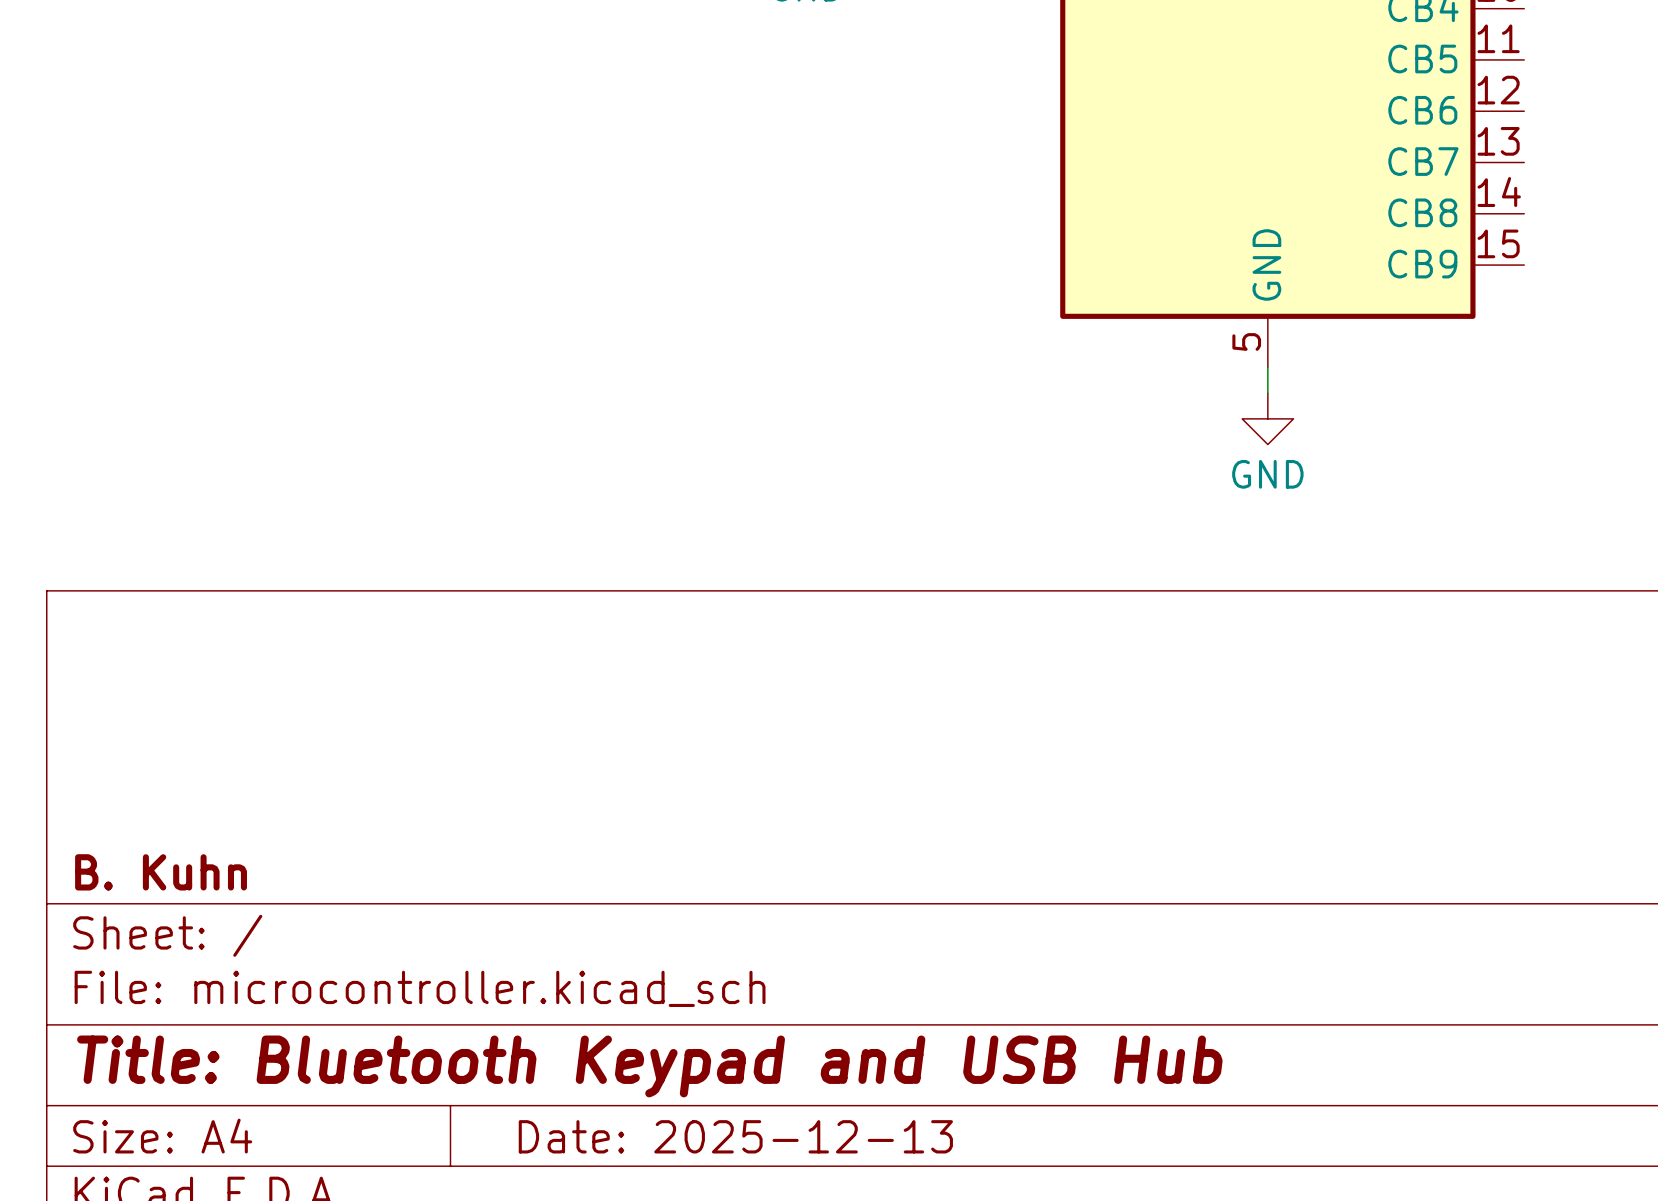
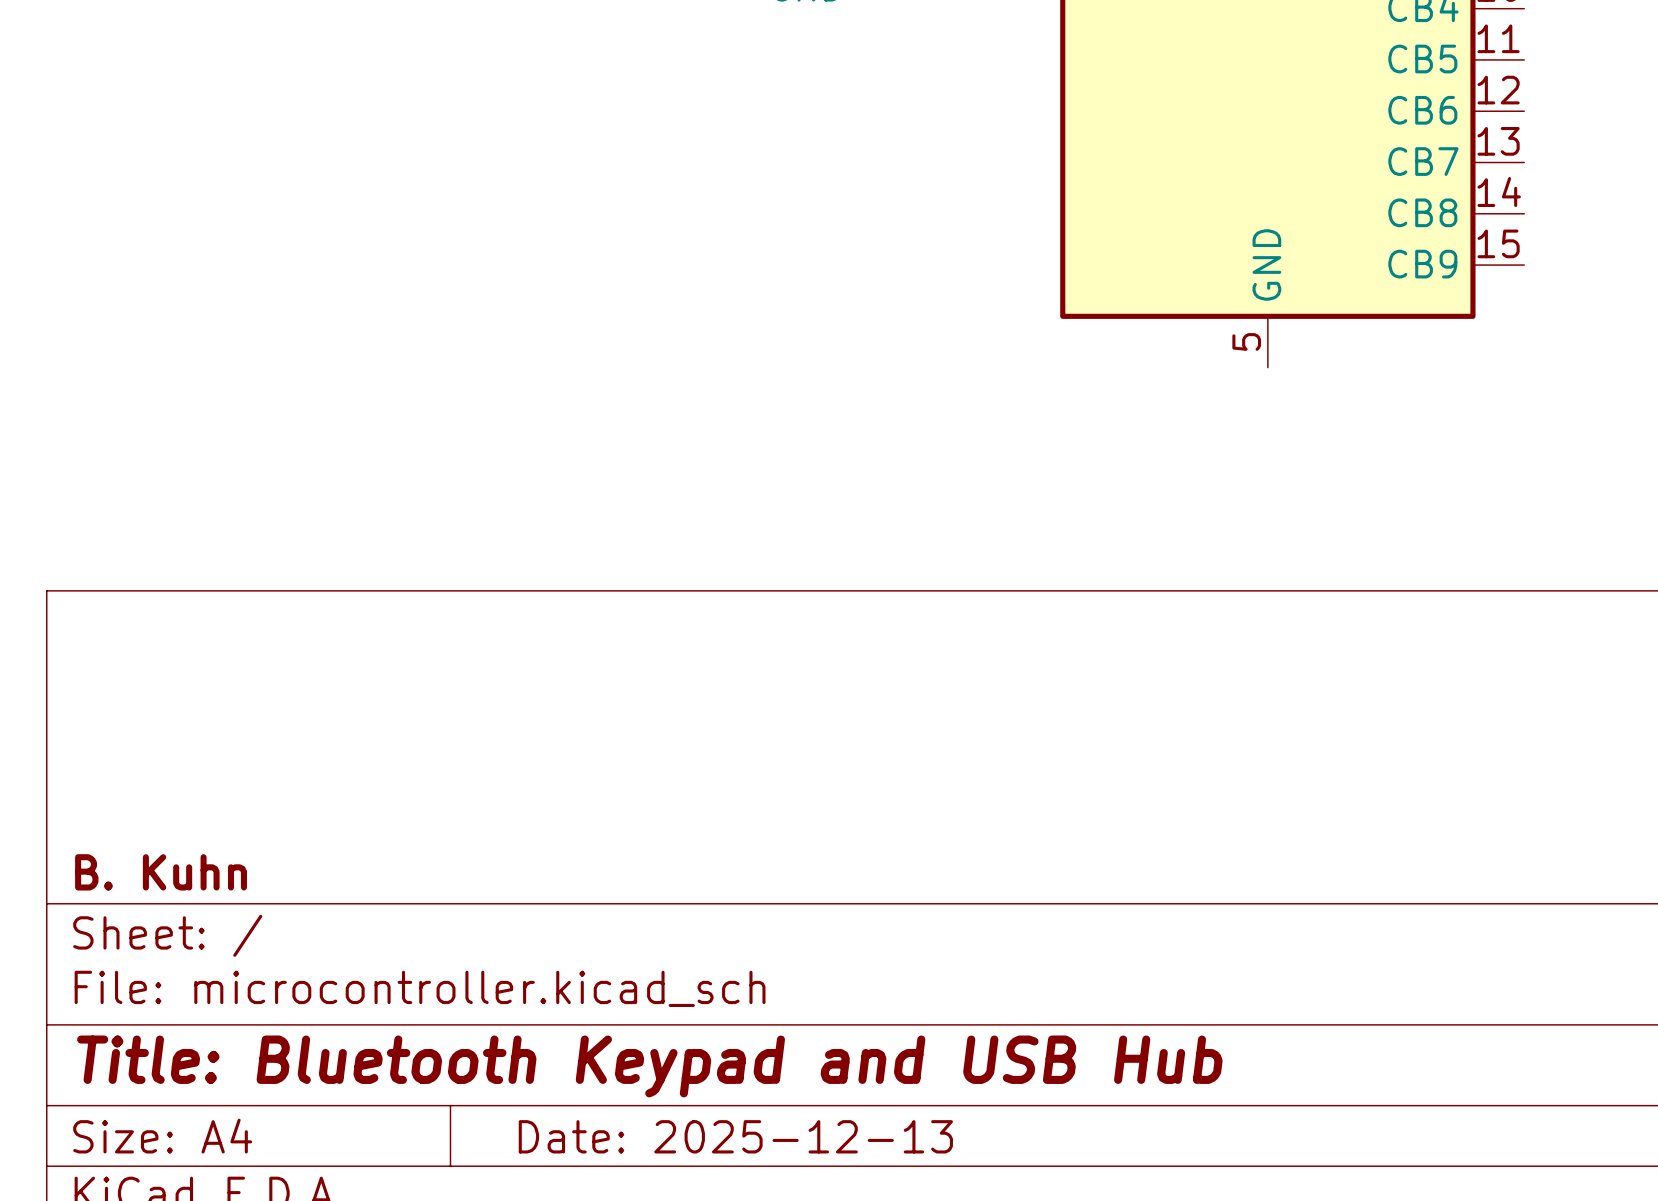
wire: (1267, 367) (1267, 393) -> none
power symbol: GND (1267, 418) -> none

